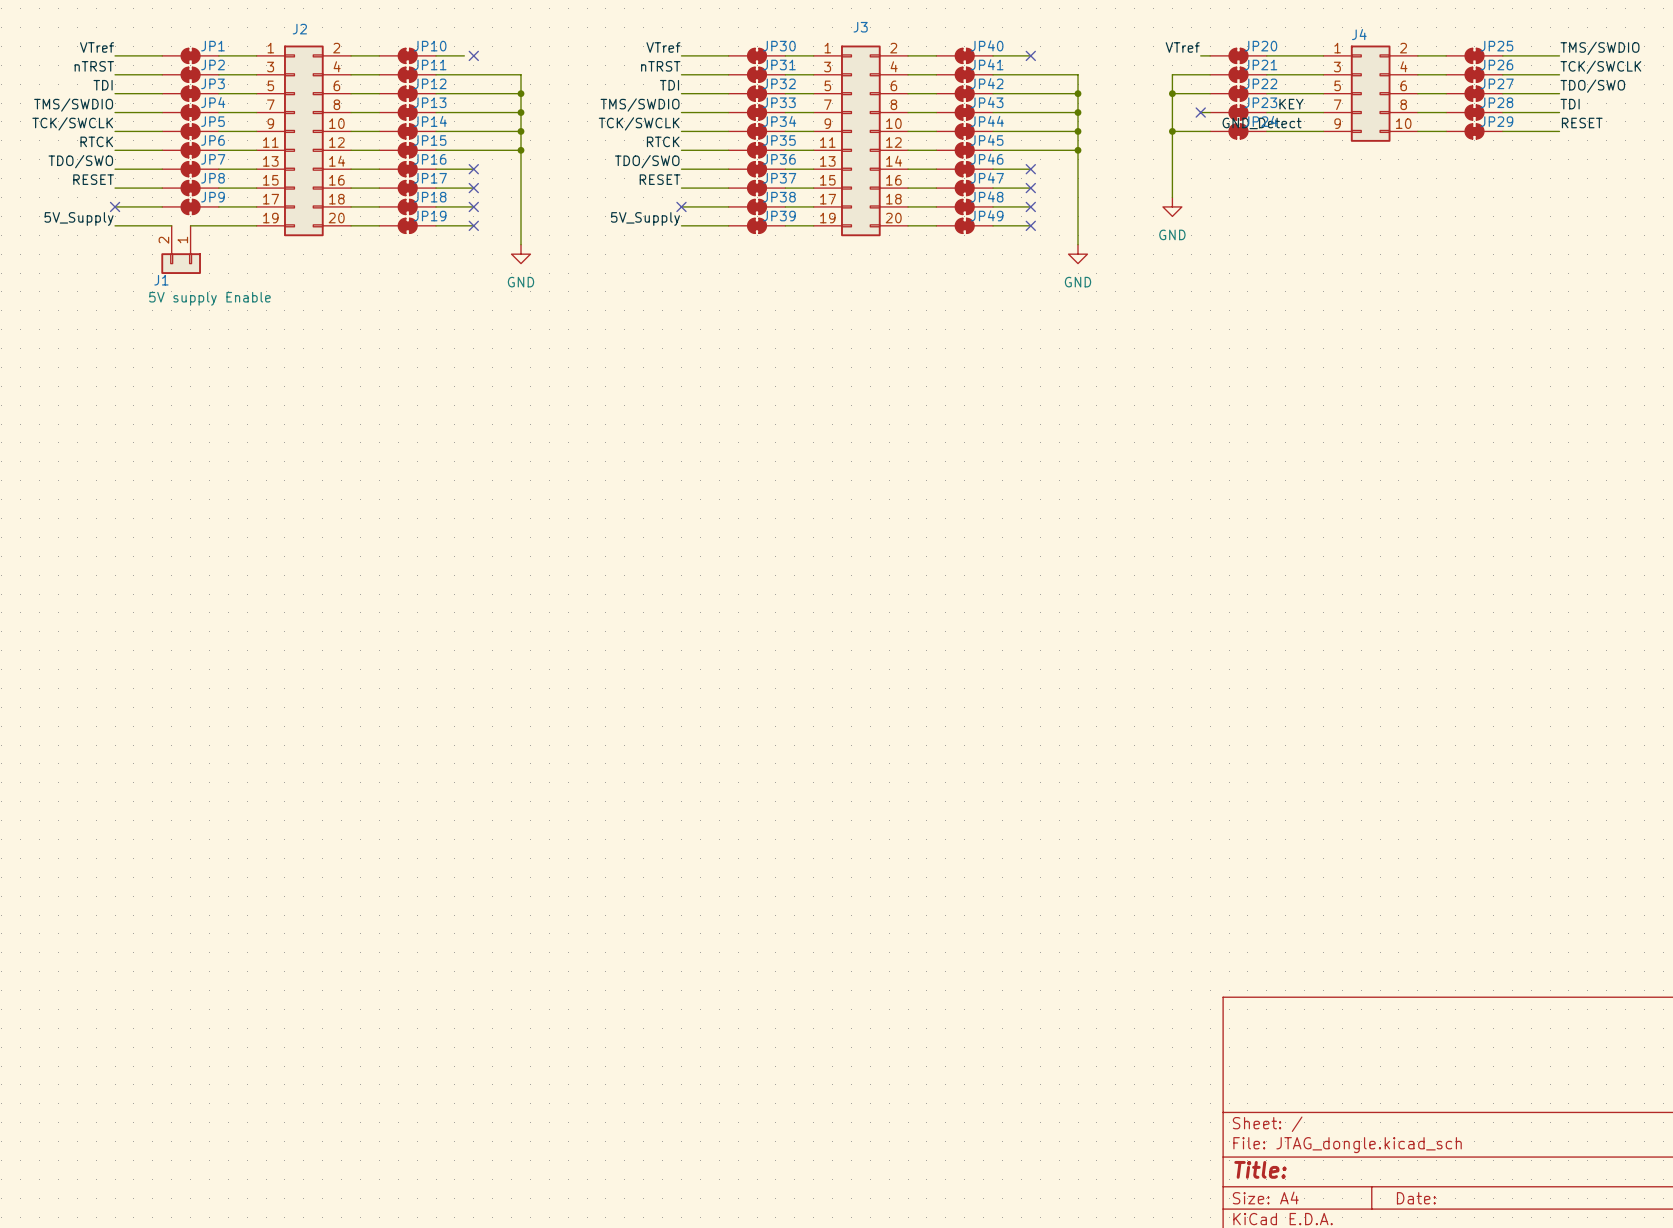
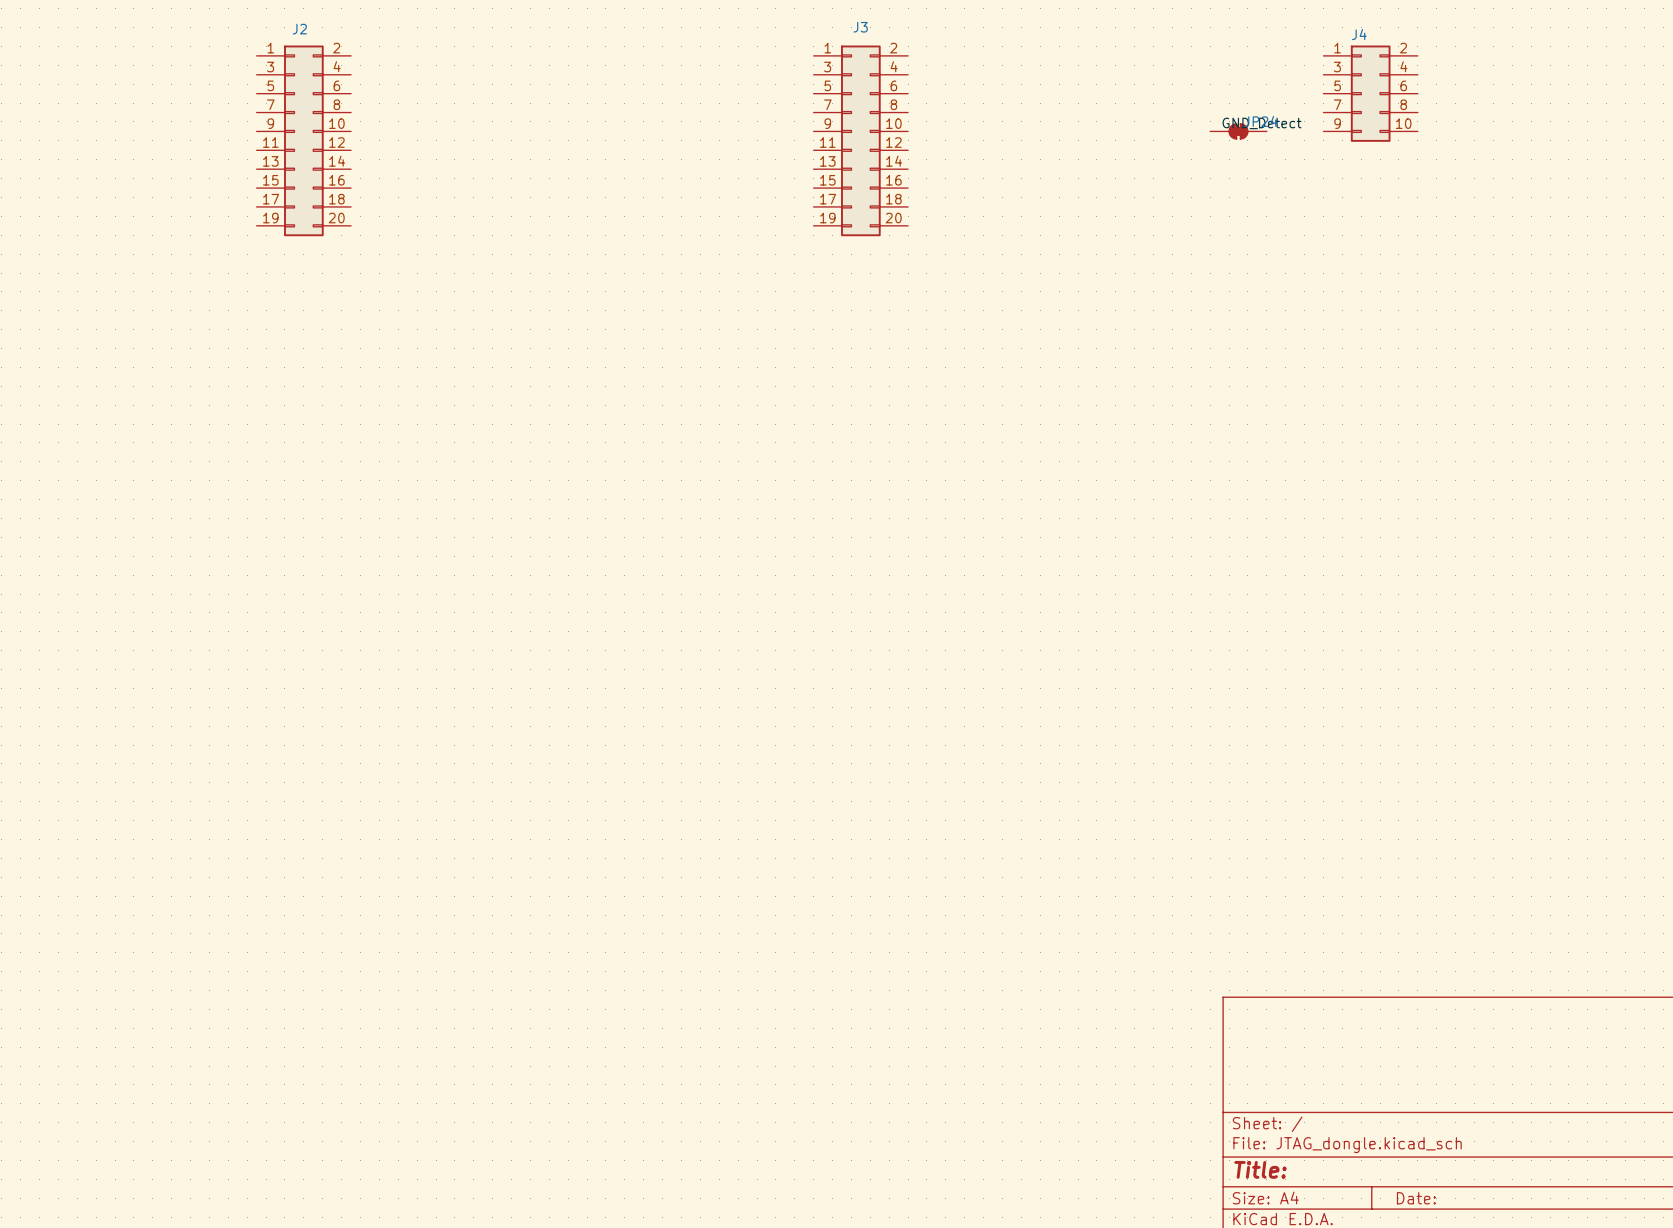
label: VTref (96, 47) -> none
label: VTref (663, 47) -> none
label: VTref (1182, 47) -> none
label: TMS/SWDIO (1600, 48) -> none
wire: (115, 55) (162, 55) -> none
JP1: (190, 55) -> none
wire: (218, 55) (256, 55) -> none
wire: (351, 55) (379, 55) -> none
JP10: (407, 55) -> none
wire: (436, 55) (464, 55) -> none
no-connect mark: (473, 55) -> none
wire: (681, 55) (728, 55) -> none
JP30: (757, 55) -> none
wire: (785, 55) (813, 55) -> none
wire: (908, 55) (936, 55) -> none
JP40: (964, 55) -> none
wire: (993, 55) (1030, 55) -> none
no-connect mark: (1030, 55) -> none
wire: (1200, 55) (1210, 55) -> none
JP20: (1238, 55) -> none
wire: (1266, 55) (1323, 55) -> none
wire: (1417, 55) (1446, 55) -> none
JP25: (1474, 55) -> none
wire: (1502, 55) (1559, 55) -> none
label: nTRST (94, 66) -> none
label: nTRST (660, 66) -> none
label: TCK/SWCLK (1600, 67) -> none
wire: (115, 74) (162, 74) -> none
JP2: (190, 74) -> none
wire: (218, 74) (256, 74) -> none
wire: (351, 74) (379, 74) -> none
JP11: (407, 74) -> none
wire: (436, 74) (521, 74) (521, 244) -> none
wire: (681, 74) (728, 74) -> none
JP31: (757, 74) -> none
wire: (785, 74) (813, 74) -> none
wire: (908, 74) (936, 74) -> none
JP41: (964, 74) -> none
wire: (993, 74) (1078, 74) (1078, 244) -> none
wire: (1210, 74) (1172, 74) (1172, 197) -> none
JP21: (1238, 74) -> none
wire: (1266, 74) (1323, 74) -> none
wire: (1417, 74) (1446, 74) -> none
JP26: (1474, 74) -> none
wire: (1502, 74) (1559, 74) -> none
label: TDI (103, 85) -> none
label: TDI (669, 85) -> none
label: TDO/SWO (1592, 86) -> none
wire: (115, 93) (162, 93) -> none
JP3: (190, 93) -> none
wire: (218, 93) (256, 93) -> none
wire: (351, 93) (379, 93) -> none
JP12: (407, 93) -> none
wire: (436, 93) (521, 93) -> none
junction: (521, 93) -> none
wire: (681, 93) (728, 93) -> none
JP32: (757, 93) -> none
wire: (785, 93) (813, 93) -> none
wire: (908, 93) (936, 93) -> none
JP42: (964, 93) -> none
wire: (993, 93) (1078, 93) -> none
junction: (1078, 93) -> none
wire: (1172, 93) (1210, 93) -> none
junction: (1172, 93) -> none
JP22: (1238, 93) -> none
wire: (1266, 93) (1323, 93) -> none
wire: (1417, 93) (1446, 93) -> none
JP27: (1474, 93) -> none
wire: (1502, 93) (1559, 93) -> none
label: KEY (1291, 104) -> none
label: TDI (1570, 104) -> none
label: TMS/SWDIO (73, 105) -> none
label: TMS/SWDIO (640, 105) -> none
wire: (115, 112) (162, 112) -> none
JP4: (190, 112) -> none
wire: (218, 112) (256, 112) -> none
wire: (351, 112) (379, 112) -> none
JP13: (407, 112) -> none
wire: (436, 112) (521, 112) -> none
junction: (521, 112) -> none
wire: (681, 112) (728, 112) -> none
JP33: (757, 112) -> none
wire: (785, 112) (813, 112) -> none
wire: (908, 112) (936, 112) -> none
JP43: (964, 112) -> none
wire: (993, 112) (1078, 112) -> none
junction: (1078, 112) -> none
wire: (1200, 112) (1210, 112) -> none
no-connect mark: (1200, 112) -> none
JP23: (1238, 112) -> none
wire: (1266, 112) (1323, 112) -> none
wire: (1417, 112) (1446, 112) -> none
JP28: (1474, 112) -> none
wire: (1502, 112) (1559, 112) -> none
label: TCK/SWCLK (72, 123) -> none
label: TCK/SWCLK (639, 123) -> none
label: RESET (1582, 123) -> none
wire: (115, 131) (162, 131) -> none
JP5: (190, 131) -> none
wire: (218, 131) (256, 131) -> none
wire: (351, 131) (379, 131) -> none
JP14: (407, 131) -> none
wire: (436, 131) (521, 131) -> none
junction: (521, 131) -> none
wire: (681, 131) (728, 131) -> none
JP34: (757, 131) -> none
wire: (785, 131) (813, 131) -> none
wire: (908, 131) (936, 131) -> none
JP44: (964, 131) -> none
wire: (993, 131) (1078, 131) -> none
junction: (1078, 131) -> none
wire: (1172, 131) (1210, 131) -> none
junction: (1172, 131) -> none
wire: (1266, 131) (1323, 131) -> none
wire: (1417, 131) (1446, 131) -> none
JP29: (1474, 131) -> none
wire: (1502, 131) (1559, 131) -> none
label: RTCK (96, 141) -> none
label: RTCK (663, 141) -> none
wire: (115, 150) (162, 150) -> none
JP6: (190, 150) -> none
wire: (218, 150) (256, 150) -> none
wire: (351, 150) (379, 150) -> none
JP15: (407, 150) -> none
wire: (436, 150) (521, 150) -> none
junction: (521, 150) -> none
wire: (681, 150) (728, 150) -> none
JP35: (757, 150) -> none
wire: (785, 150) (813, 150) -> none
wire: (908, 150) (936, 150) -> none
JP45: (964, 150) -> none
wire: (993, 150) (1078, 150) -> none
junction: (1078, 150) -> none
label: TDO/SWO (80, 161) -> none
label: TDO/SWO (647, 161) -> none
wire: (115, 169) (162, 169) -> none
JP7: (190, 169) -> none
wire: (218, 169) (256, 169) -> none
wire: (351, 169) (379, 169) -> none
JP16: (407, 169) -> none
wire: (436, 169) (473, 169) -> none
no-connect mark: (473, 169) -> none
wire: (681, 169) (728, 169) -> none
JP36: (757, 169) -> none
wire: (785, 169) (813, 169) -> none
wire: (908, 169) (936, 169) -> none
JP46: (964, 169) -> none
wire: (993, 169) (1030, 169) -> none
no-connect mark: (1030, 169) -> none
label: RESET (93, 179) -> none
label: RESET (660, 179) -> none
wire: (115, 188) (162, 188) -> none
JP8: (190, 188) -> none
wire: (218, 188) (256, 188) -> none
wire: (351, 188) (379, 188) -> none
JP17: (407, 188) -> none
wire: (436, 188) (473, 188) -> none
no-connect mark: (473, 188) -> none
wire: (681, 188) (728, 188) -> none
JP37: (757, 188) -> none
wire: (785, 188) (813, 188) -> none
wire: (908, 188) (936, 188) -> none
JP47: (964, 188) -> none
wire: (993, 188) (1030, 188) -> none
no-connect mark: (1030, 188) -> none
wire: (115, 206) (162, 206) -> none
no-connect mark: (115, 206) -> none
JP9: (190, 206) -> none
wire: (218, 206) (256, 206) -> none
wire: (351, 206) (379, 206) -> none
JP18: (407, 206) -> none
wire: (436, 206) (473, 206) -> none
no-connect mark: (473, 206) -> none
wire: (681, 206) (728, 206) -> none
no-connect mark: (681, 206) -> none
JP38: (757, 206) -> none
wire: (785, 206) (813, 206) -> none
wire: (908, 206) (936, 206) -> none
JP48: (964, 206) -> none
wire: (993, 206) (1030, 206) -> none
no-connect mark: (1030, 206) -> none
power symbol: GND (1172, 206) -> none
label: 5V_Supply (79, 218) -> none
label: 5V_Supply (645, 218) -> none
wire: (115, 225) (171, 225) -> none
wire: (190, 225) (256, 225) -> none
wire: (351, 225) (379, 225) -> none
JP19: (407, 225) -> none
wire: (436, 225) (473, 225) -> none
no-connect mark: (473, 225) -> none
wire: (681, 225) (728, 225) -> none
JP39: (757, 225) -> none
wire: (785, 225) (813, 225) -> none
wire: (908, 225) (936, 225) -> none
JP49: (964, 225) -> none
wire: (993, 225) (1030, 225) -> none
no-connect mark: (1030, 225) -> none
J1: 5V supply Enable (181, 249) -> none
power symbol: GND (521, 254) -> none
power symbol: GND (1078, 254) -> none

